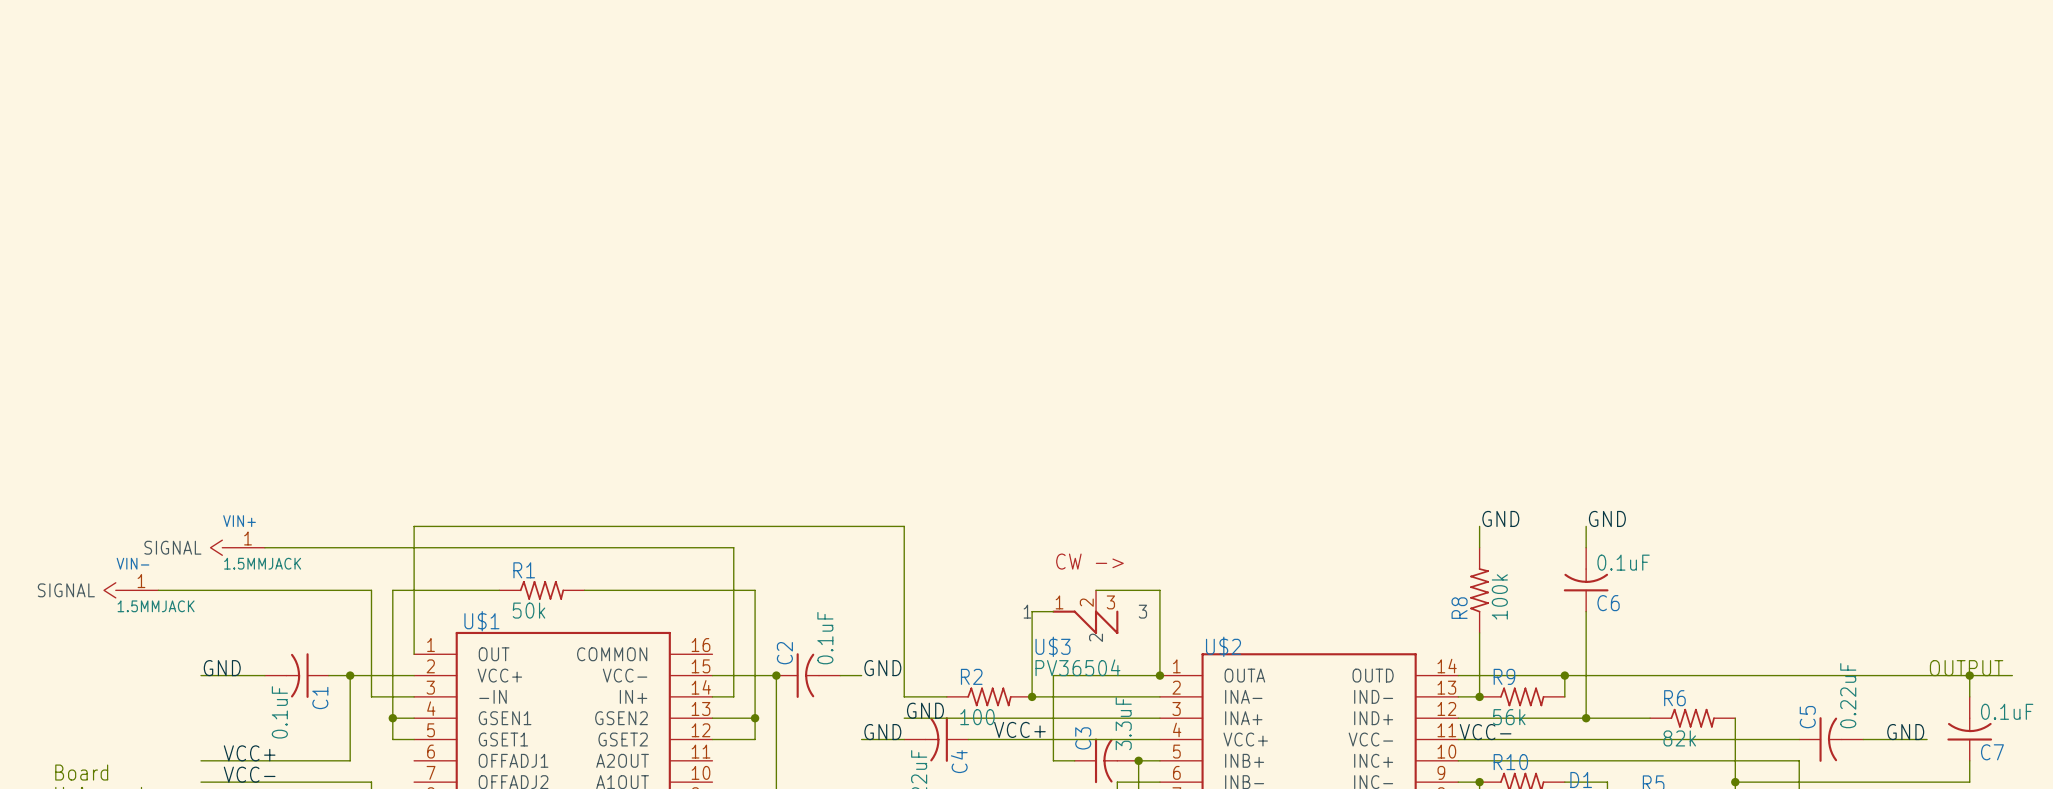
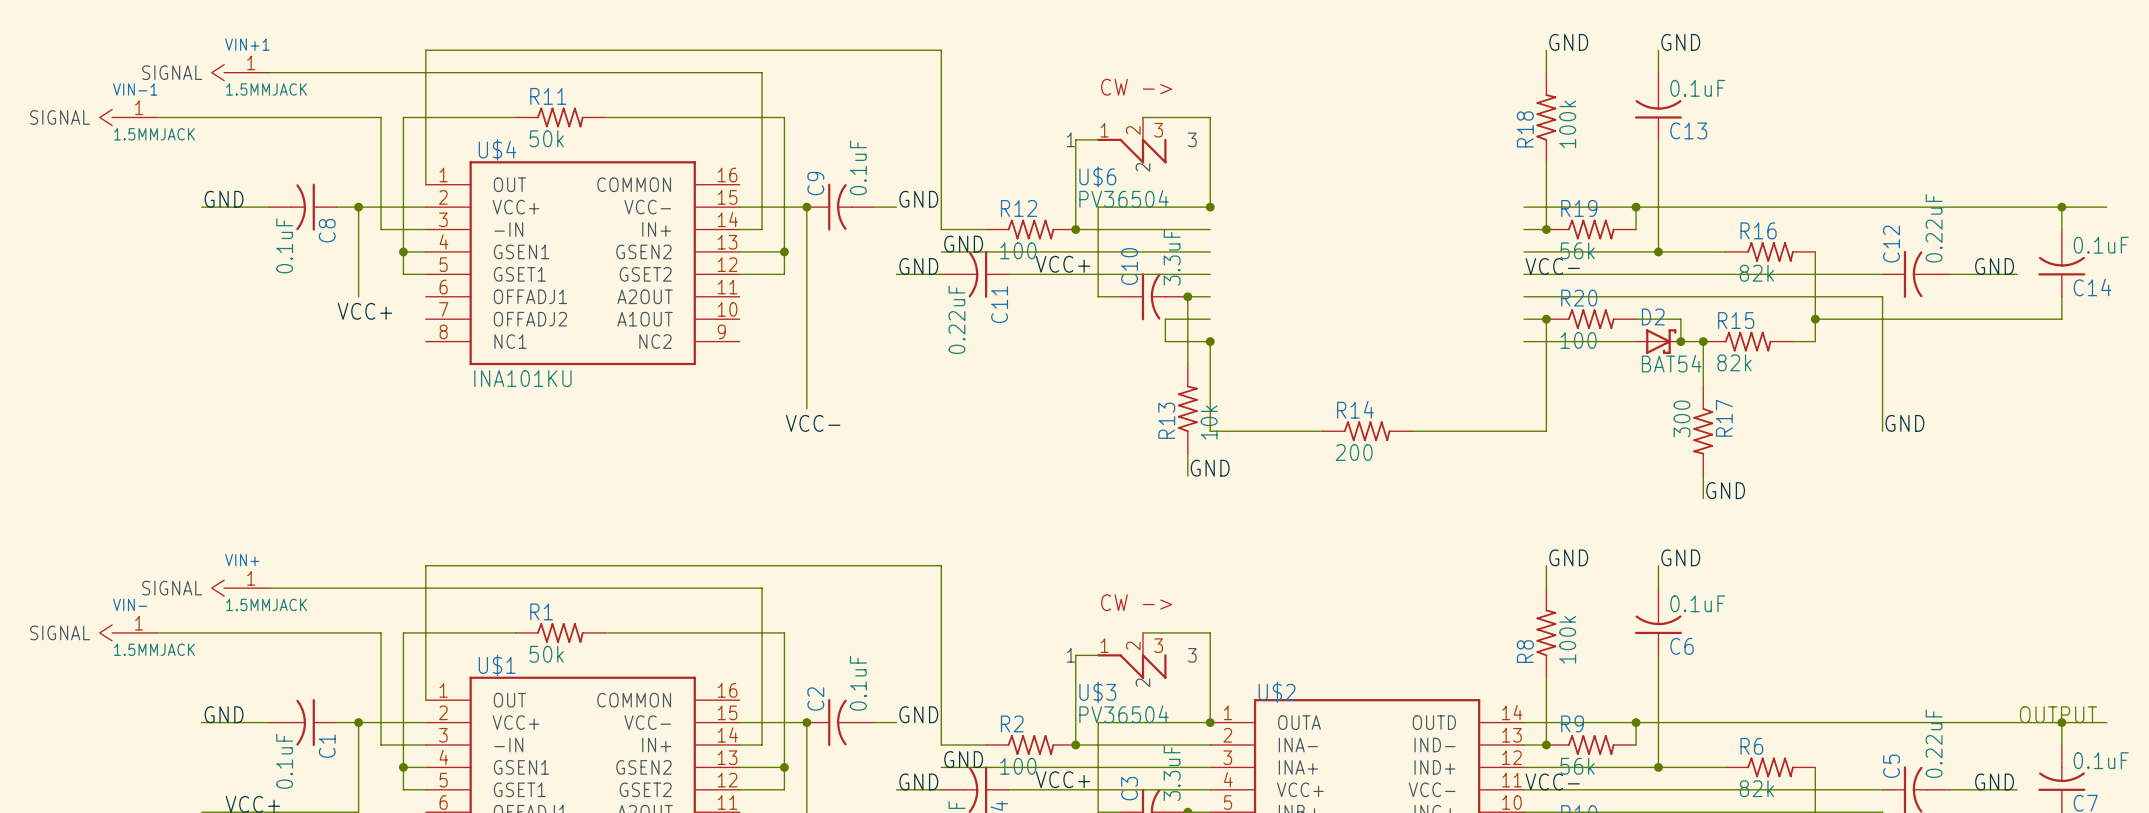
label: none -> GND (1568, 42)
label: none -> GND (1680, 42)
wire: none -> (1546, 50) (1546, 72)
wire: none -> (1658, 50) (1658, 72)
VIN+1: none -> 1.5MMJACK (240, 72)
wire: none -> (268, 72) (762, 72) (762, 229) (739, 229)
C13: none -> 0.1uF (1658, 106)
VIN-1: none -> 1.5MMJACK (128, 117)
wire: none -> (156, 117) (381, 117) (381, 229) (425, 229)
wire: none -> (515, 117) (403, 117) (403, 274) (425, 274)
R11: none -> 50k (560, 117)
wire: none -> (605, 117) (784, 117) (784, 274) (739, 274)
wire: none -> (1142, 117) (1210, 117) (1210, 207) (1098, 207) (1098, 296) (1120, 296)
R18: none -> 100k (1546, 117)
wire: none -> (1098, 139) (1075, 139) (1075, 229) (1210, 229)
wire: none -> (1658, 139) (1658, 251)
U$6: none -> PV36504 (1131, 140)
wire: none -> (1546, 162) (1546, 229) (1523, 229)
wire: none -> (425, 184) (425, 50) (941, 50) (941, 229) (986, 229)
label: none -> GND (224, 199)
label: none -> GND (918, 199)
wire: none -> (201, 207) (268, 207)
C8: none -> 0.1uF (302, 207)
wire: none -> (336, 207) (425, 207)
wire: none -> (358, 207) (358, 296)
junction: none -> (358, 207)
wire: none -> (739, 207) (806, 207) (806, 408)
junction: none -> (806, 207)
C9: none -> 0.1uF (840, 207)
wire: none -> (874, 207) (896, 207)
junction: none -> (1210, 207)
wire: none -> (1523, 207) (2106, 207)
wire: none -> (1636, 207) (1636, 229)
junction: none -> (1636, 207)
wire: none -> (2061, 207) (2061, 229)
junction: none -> (2061, 207)
R12: none -> 100 (1030, 229)
junction: none -> (1075, 229)
junction: none -> (1546, 229)
R19: none -> 56k (1591, 229)
label: none -> GND (963, 244)
wire: none -> (403, 251) (425, 251)
junction: none -> (403, 251)
wire: none -> (739, 251) (784, 251)
junction: none -> (784, 251)
wire: none -> (941, 251) (1210, 251)
wire: none -> (1523, 251) (1725, 251)
junction: none -> (1658, 251)
R16: none -> 82k (1770, 251)
wire: none -> (1815, 251) (1815, 341) (1792, 341)
U$4: none -> INA101KU (582, 263)
C14: none -> 0.1uF (2061, 263)
label: none -> VCC+ (1062, 264)
label: none -> GND (918, 266)
label: none -> VCC- (1552, 266)
label: none -> GND (1994, 266)
wire: none -> (896, 274) (941, 274)
C11: none -> 0.22uF (974, 274)
wire: none -> (1008, 274) (1210, 274)
wire: none -> (1523, 274) (1882, 274)
C12: none -> 0.22uF (1916, 274)
wire: none -> (1949, 274) (2017, 274)
C10: none -> 3.3uF (1154, 296)
junction: none -> (1187, 296)
wire: none -> (1210, 296) (1187, 296) (1187, 364)
wire: none -> (1523, 296) (1882, 296) (1882, 431)
wire: none -> (2061, 296) (2061, 319) (1815, 319)
label: none -> VCC+ (364, 311)
wire: none -> (1210, 319) (1165, 319) (1165, 341) (1210, 341) (1210, 431) (1322, 431)
wire: none -> (1523, 319) (1546, 319) (1546, 431) (1411, 431)
junction: none -> (1546, 319)
R20: none -> 100 (1591, 319)
wire: none -> (1636, 319) (1680, 319) (1680, 341) (1703, 341) (1703, 386)
junction: none -> (1815, 319)
junction: none -> (1210, 341)
wire: none -> (1523, 341) (1636, 341)
D2: none -> BAT54 (1658, 341)
junction: none -> (1680, 341)
junction: none -> (1703, 341)
R15: none -> 82k (1748, 341)
R13: none -> 10k (1187, 408)
label: none -> VCC- (813, 423)
label: none -> GND (1904, 423)
R14: none -> 200 (1367, 431)
R17: none -> 300 (1703, 431)
wire: none -> (1187, 453) (1187, 476)
label: none -> GND (1210, 468)
wire: none -> (1703, 476) (1703, 498)
label: none -> GND (1725, 490)

